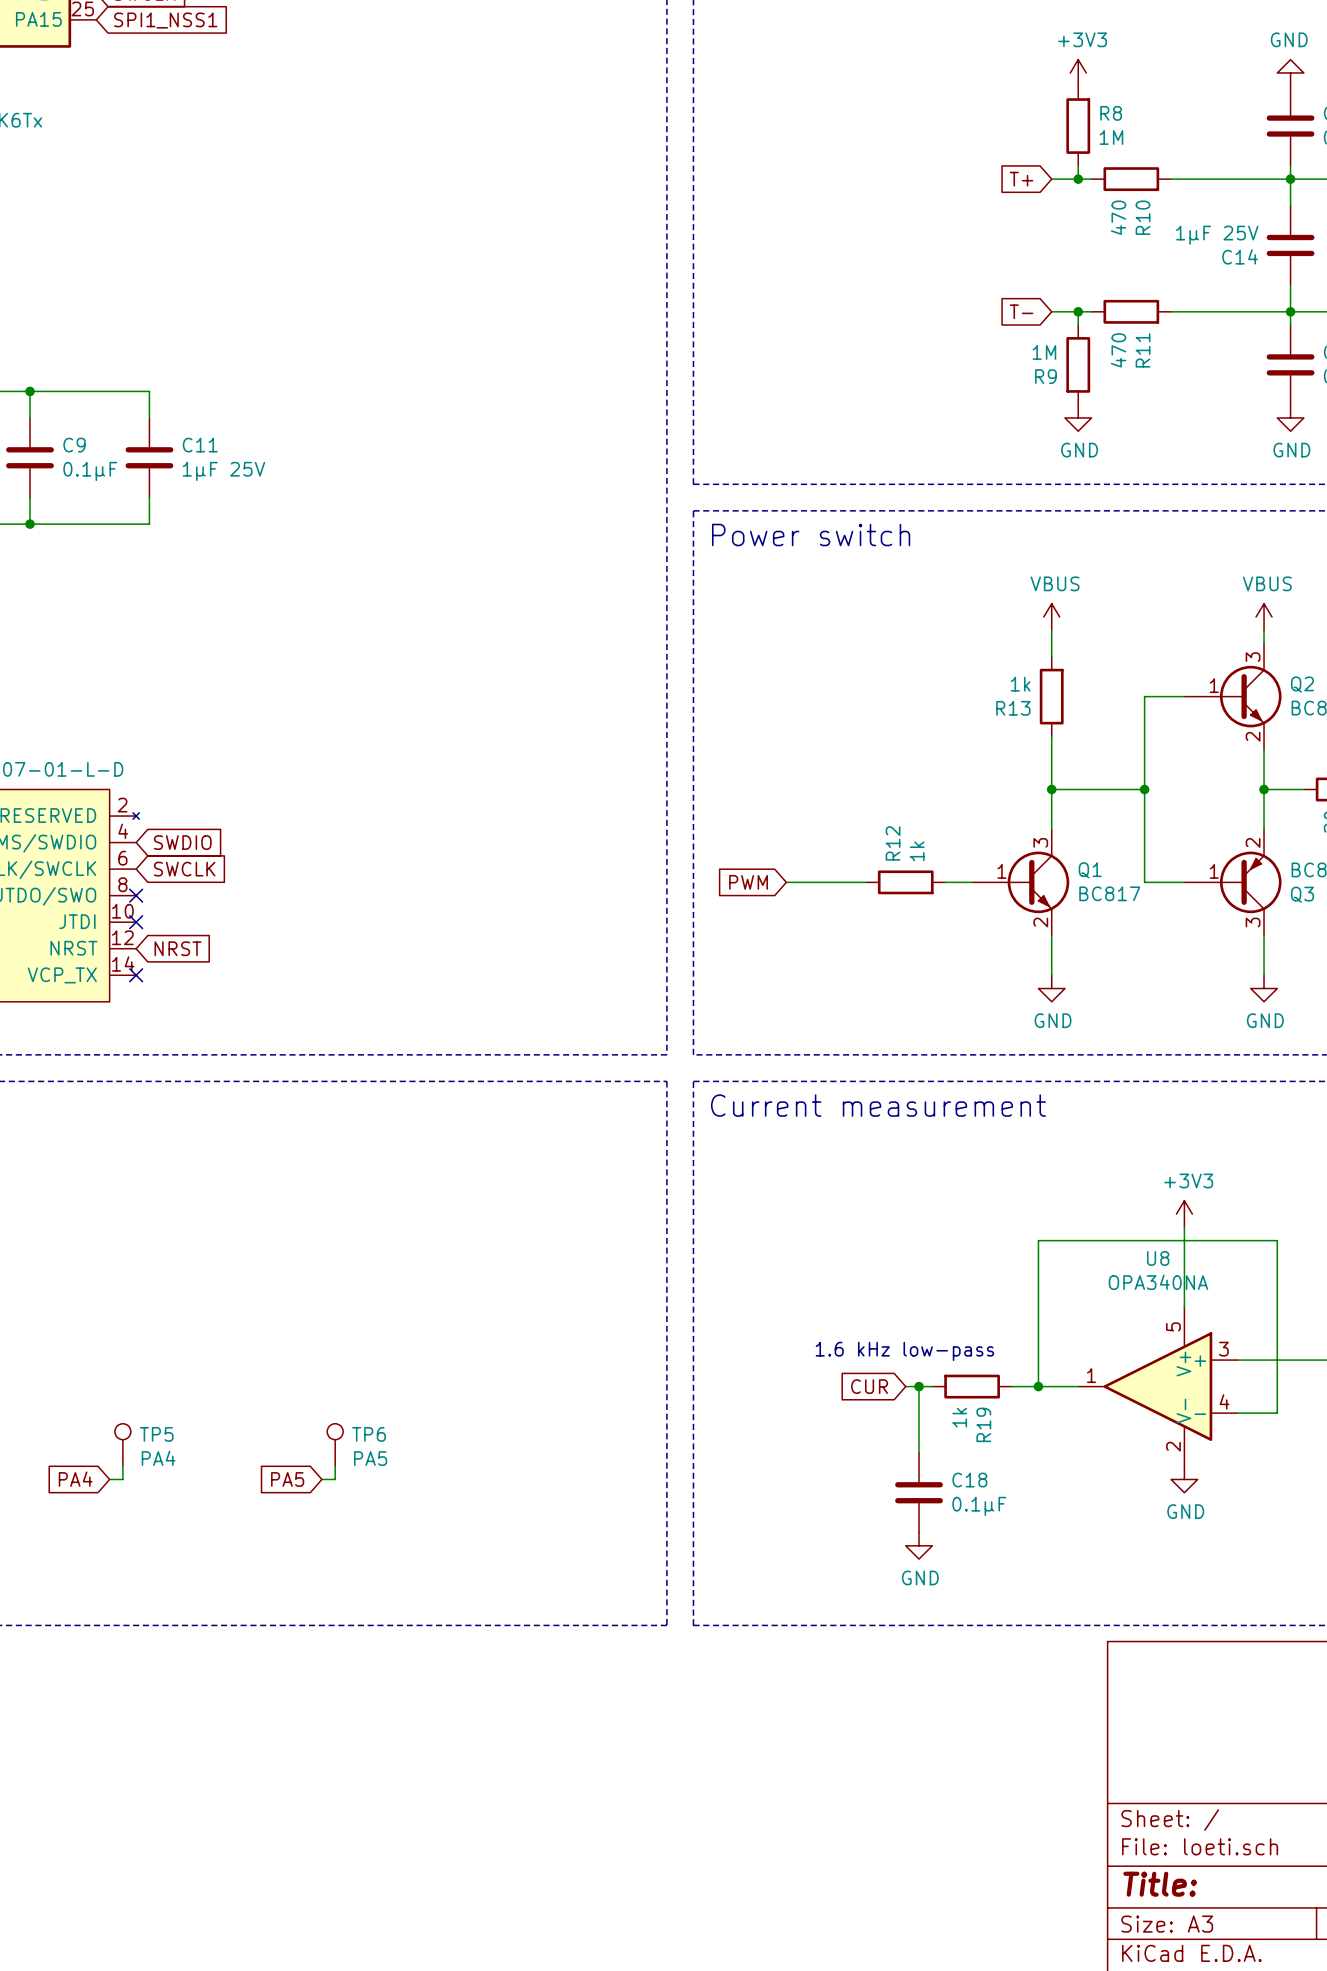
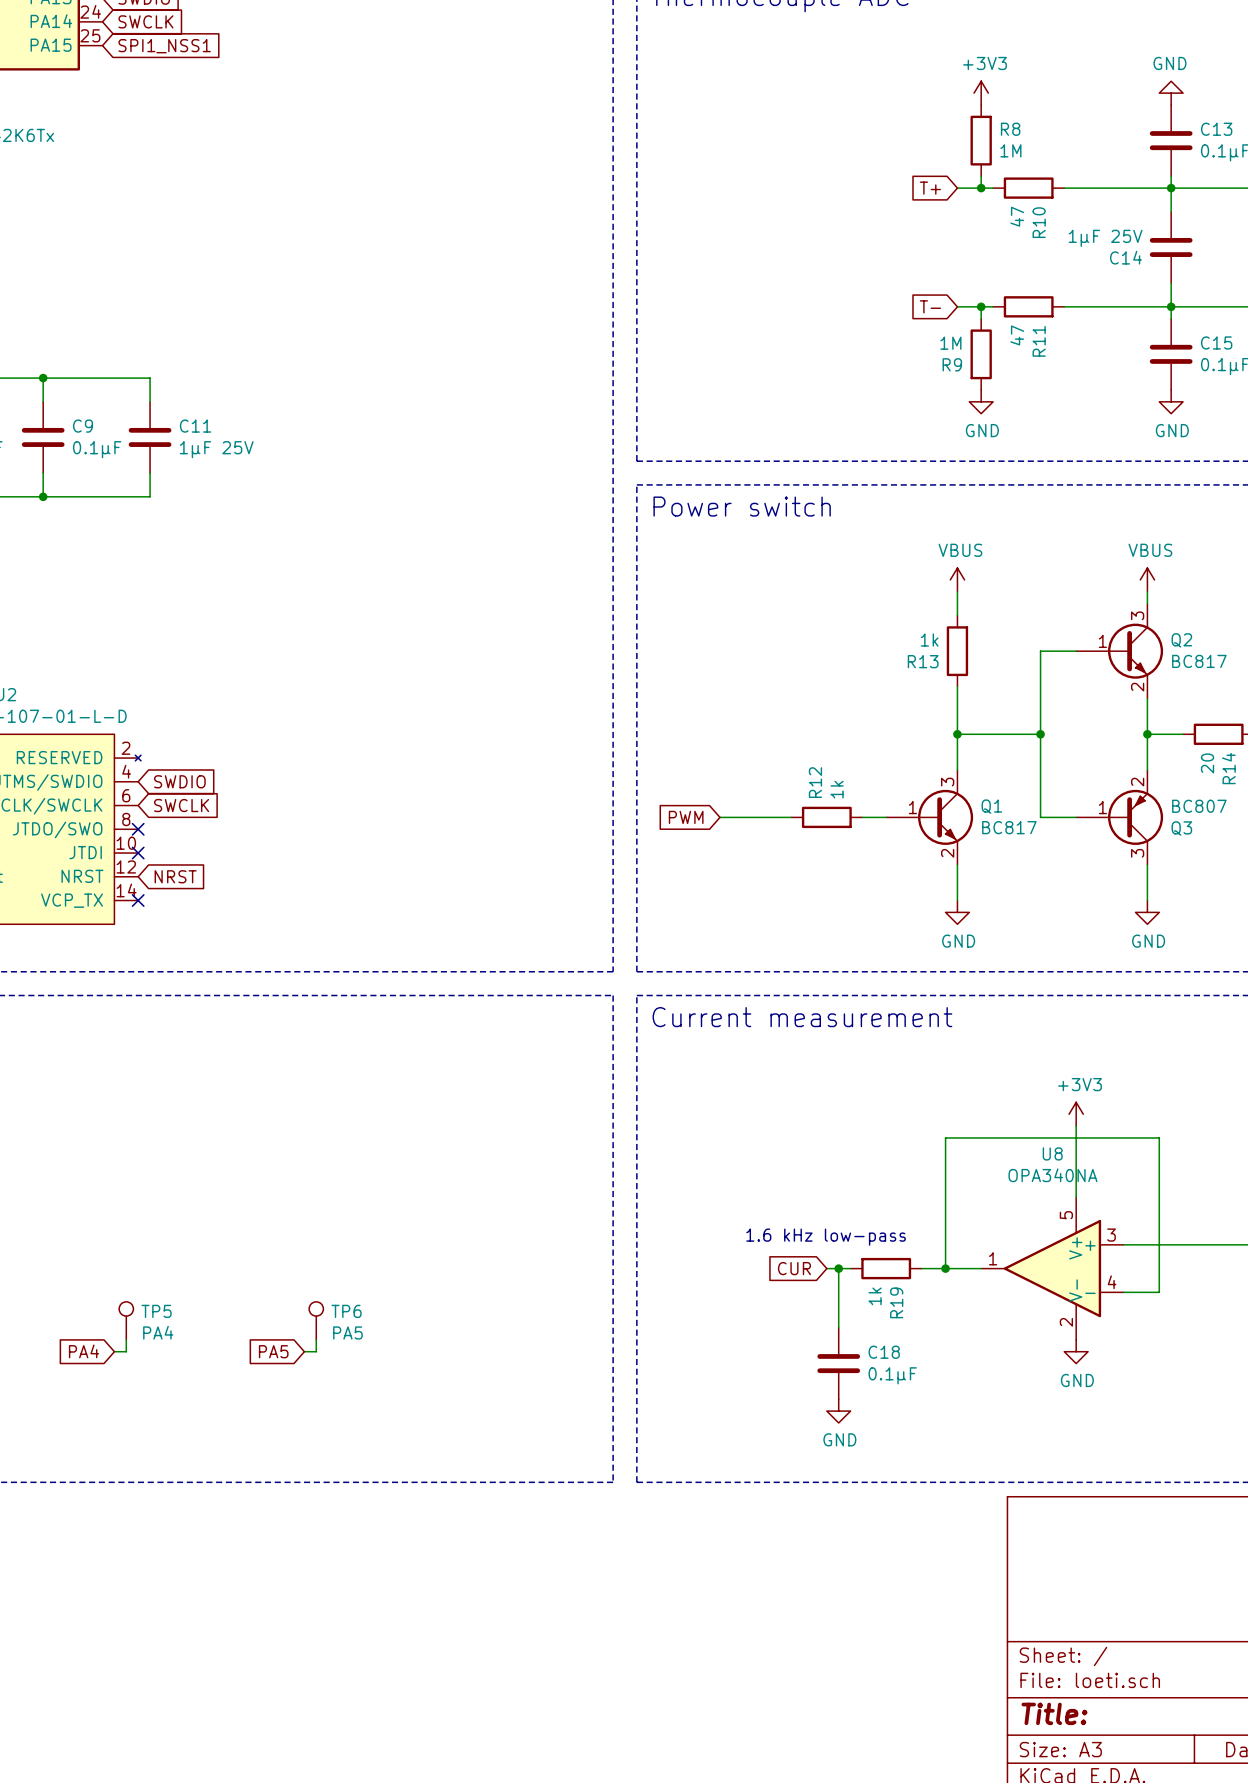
R10 value: 470 (1118, 217) -> 47 (1017, 216)
R11 value: 470 (1118, 350) -> 47 (1017, 335)

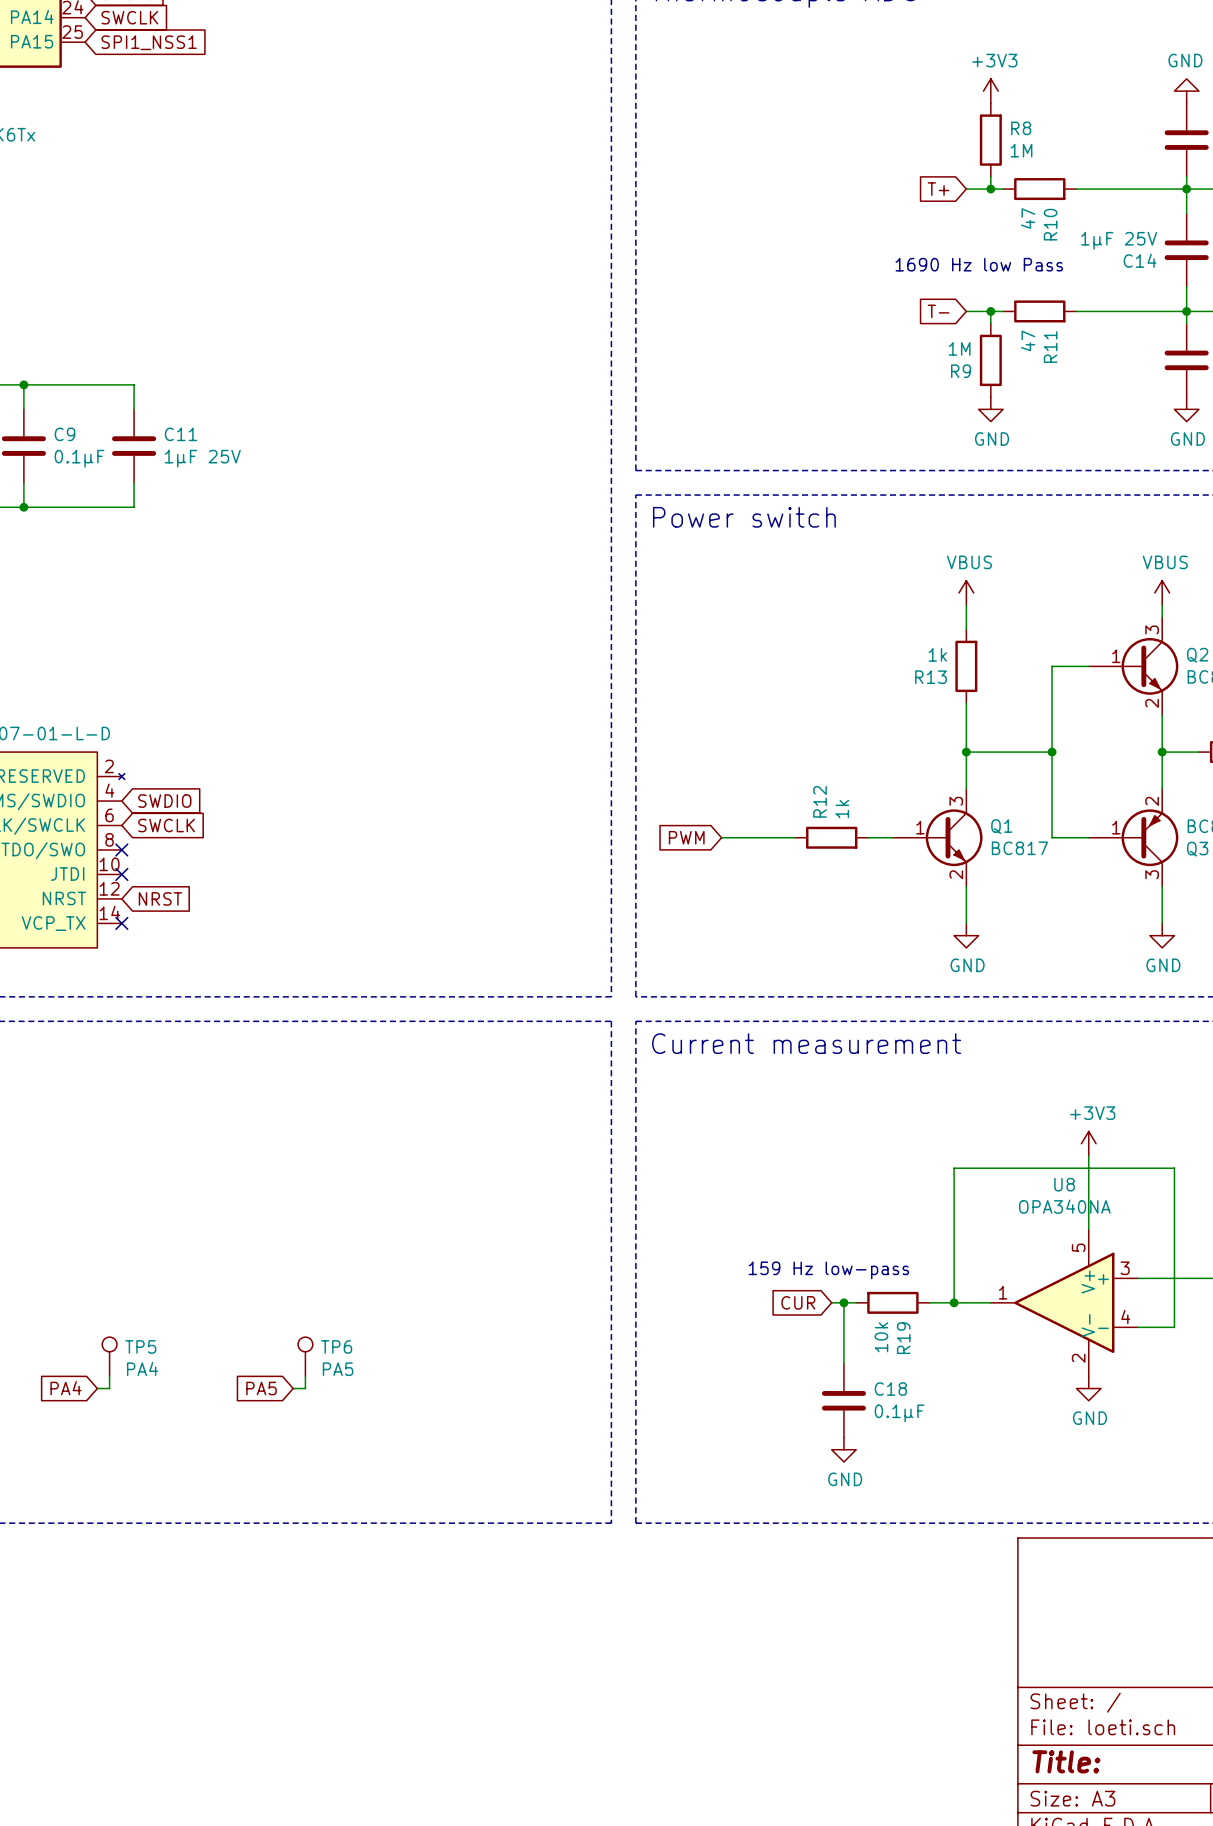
text: none -> 1690 Hz low Pass (979, 264)
text: 1.6 kHz low-pass (826, 1237) -> 159 Hz low-pass (828, 1270)
R19 value: 1k (875, 1296) -> 10k (881, 1337)

